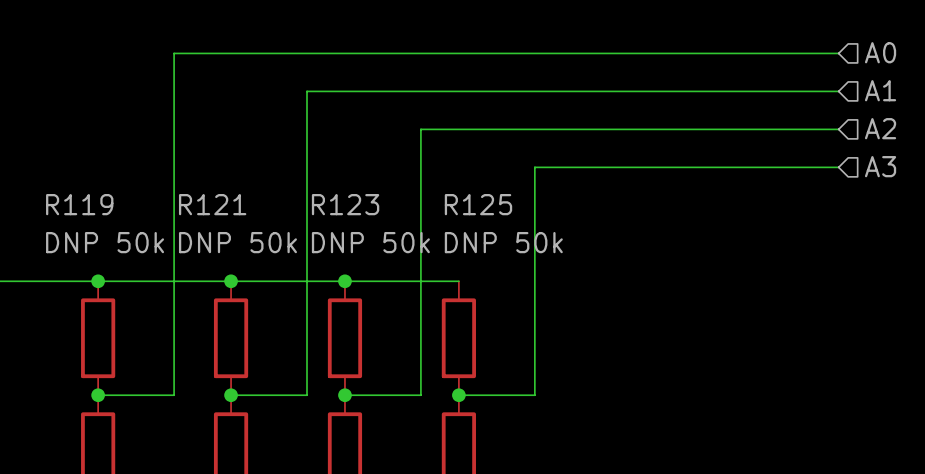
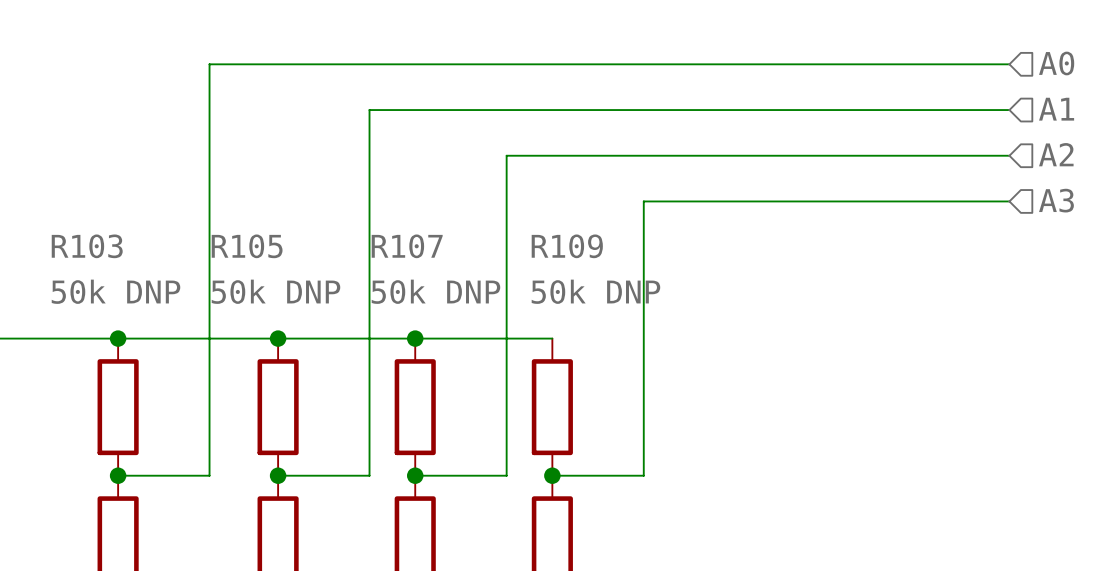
R119 name: R119 (79, 204) -> R103 (87, 246)
R121 name: R121 (212, 204) -> R105 (247, 246)
R123 name: R123 (345, 204) -> R107 (407, 246)
R125 name: R125 (478, 204) -> R109 (567, 246)
R119 value: DNP 50k (105, 242) -> 50k DNP (115, 291)
R121 value: DNP 50k (237, 242) -> 50k DNP (275, 291)
R123 value: DNP 50k (370, 242) -> 50k DNP (435, 291)
R125 value: DNP 50k (503, 242) -> 50k DNP (595, 291)

